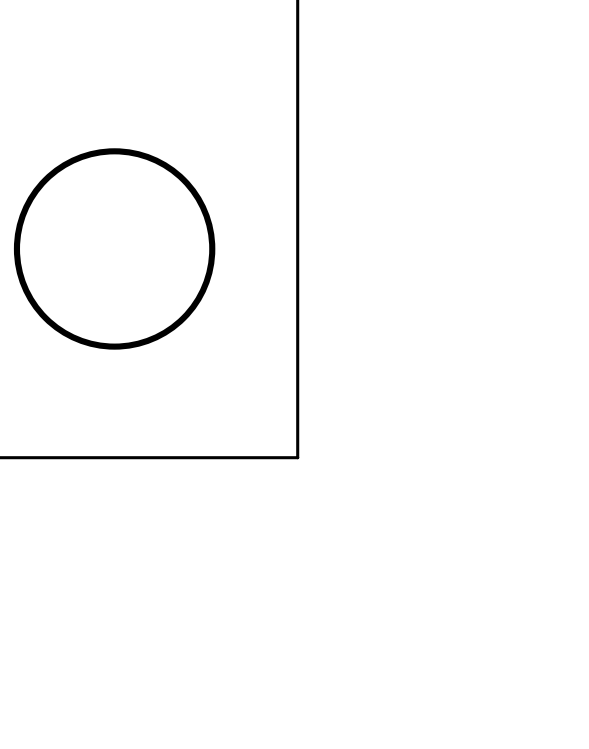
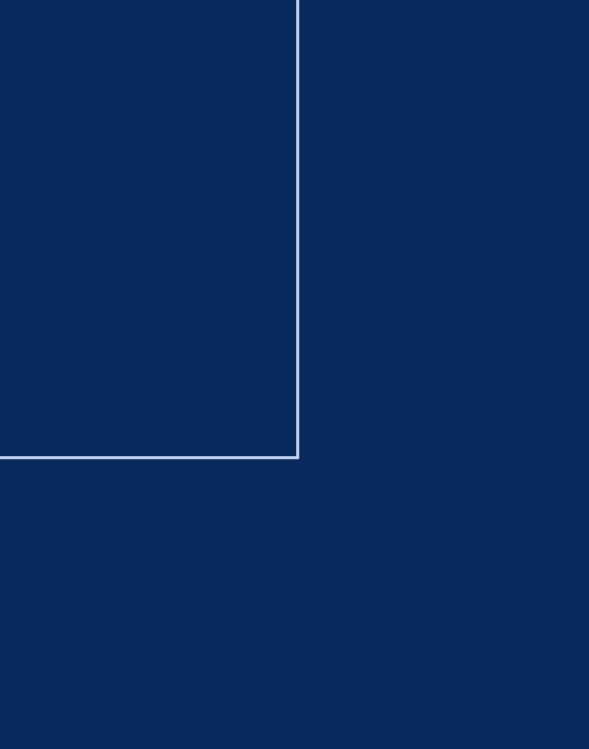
round board edge: [13, 148, 216, 350] -> none

